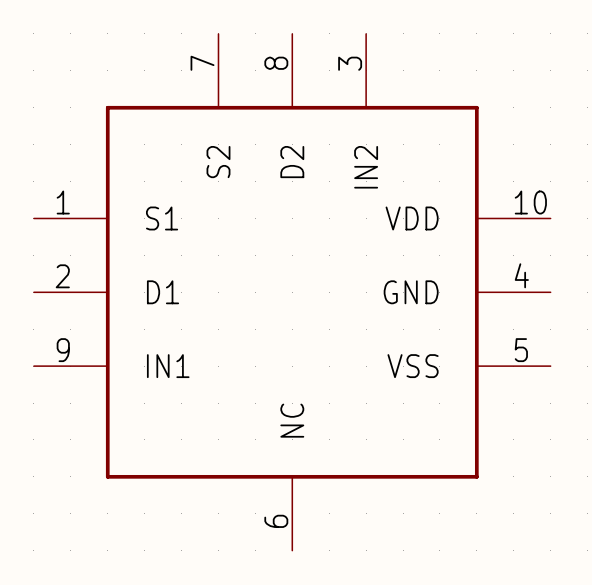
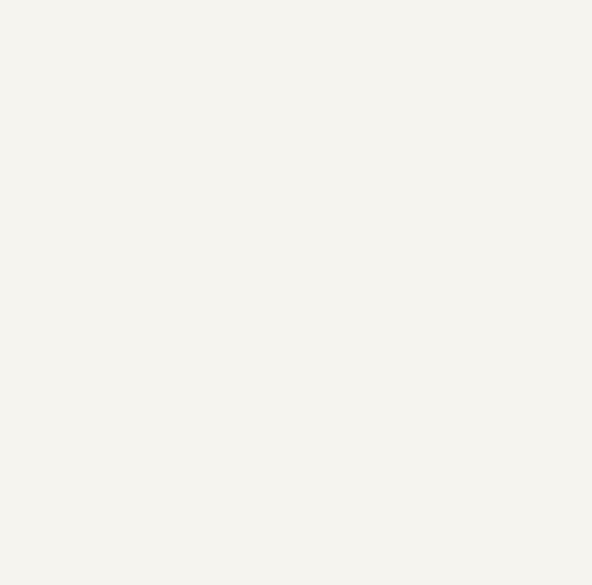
part: (292, 292) -> none

